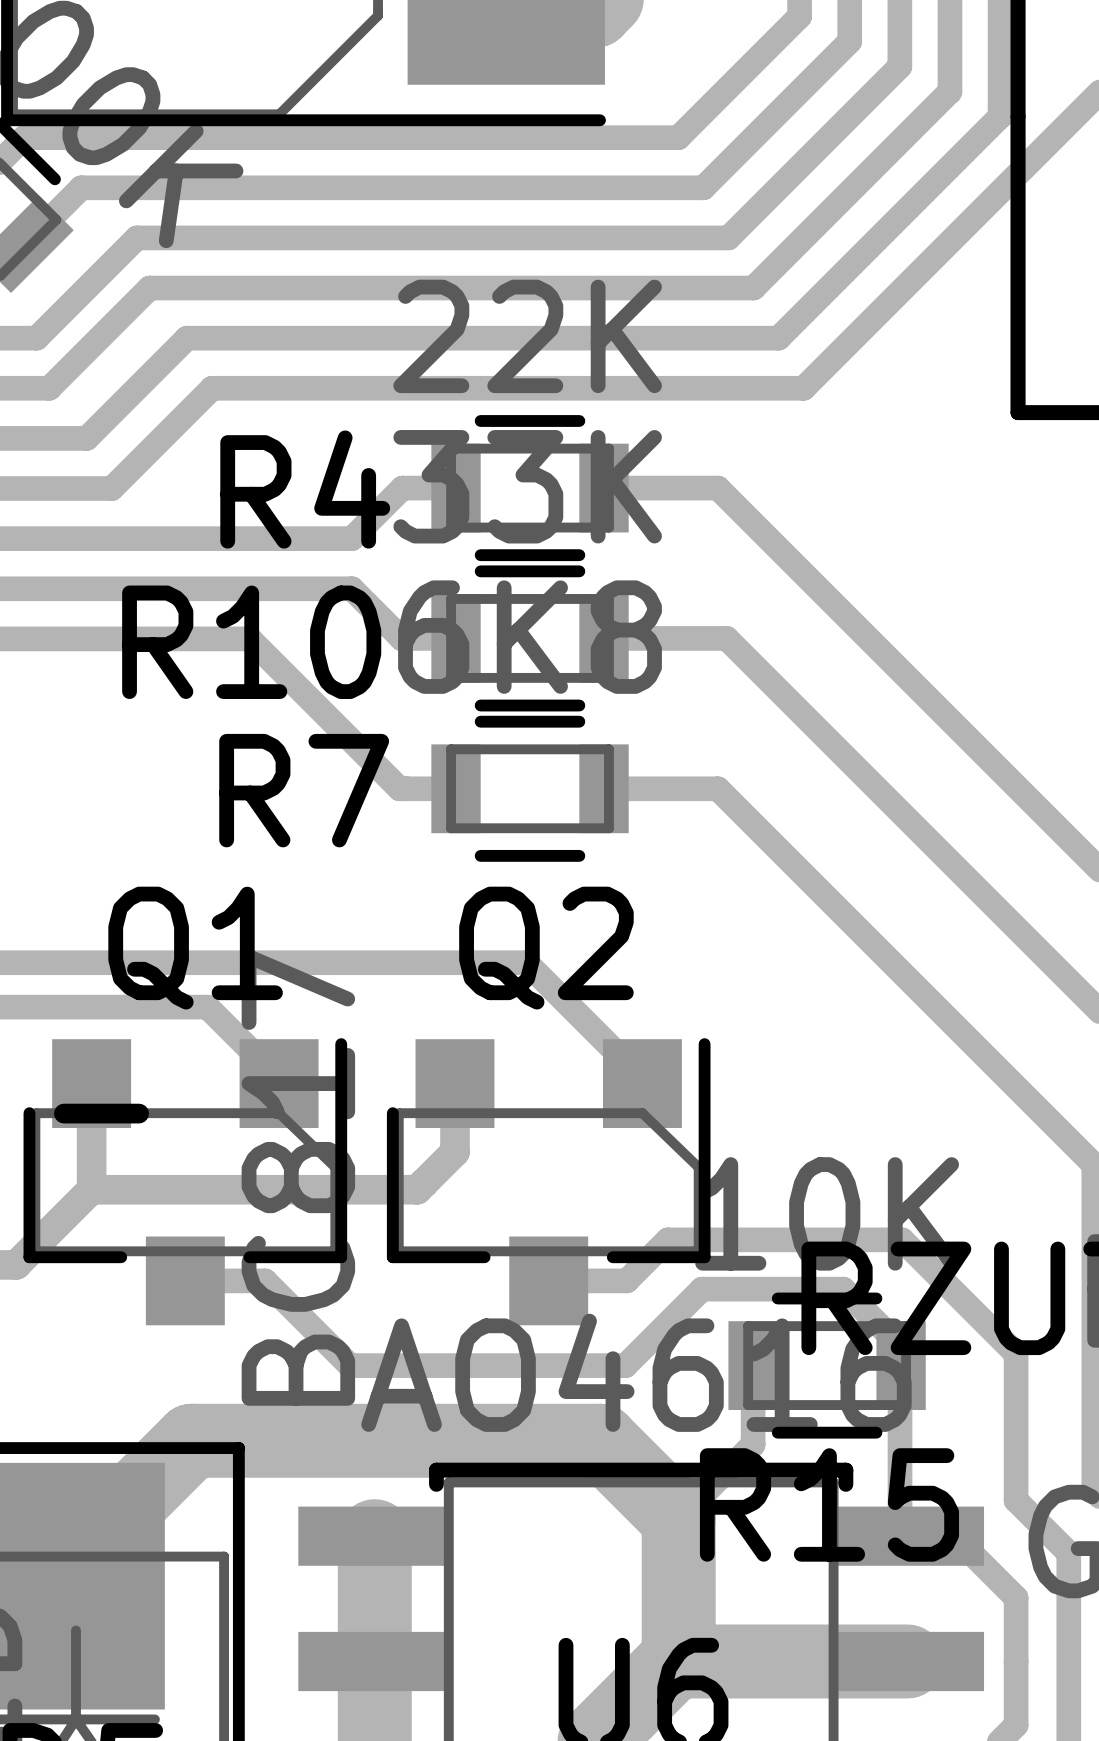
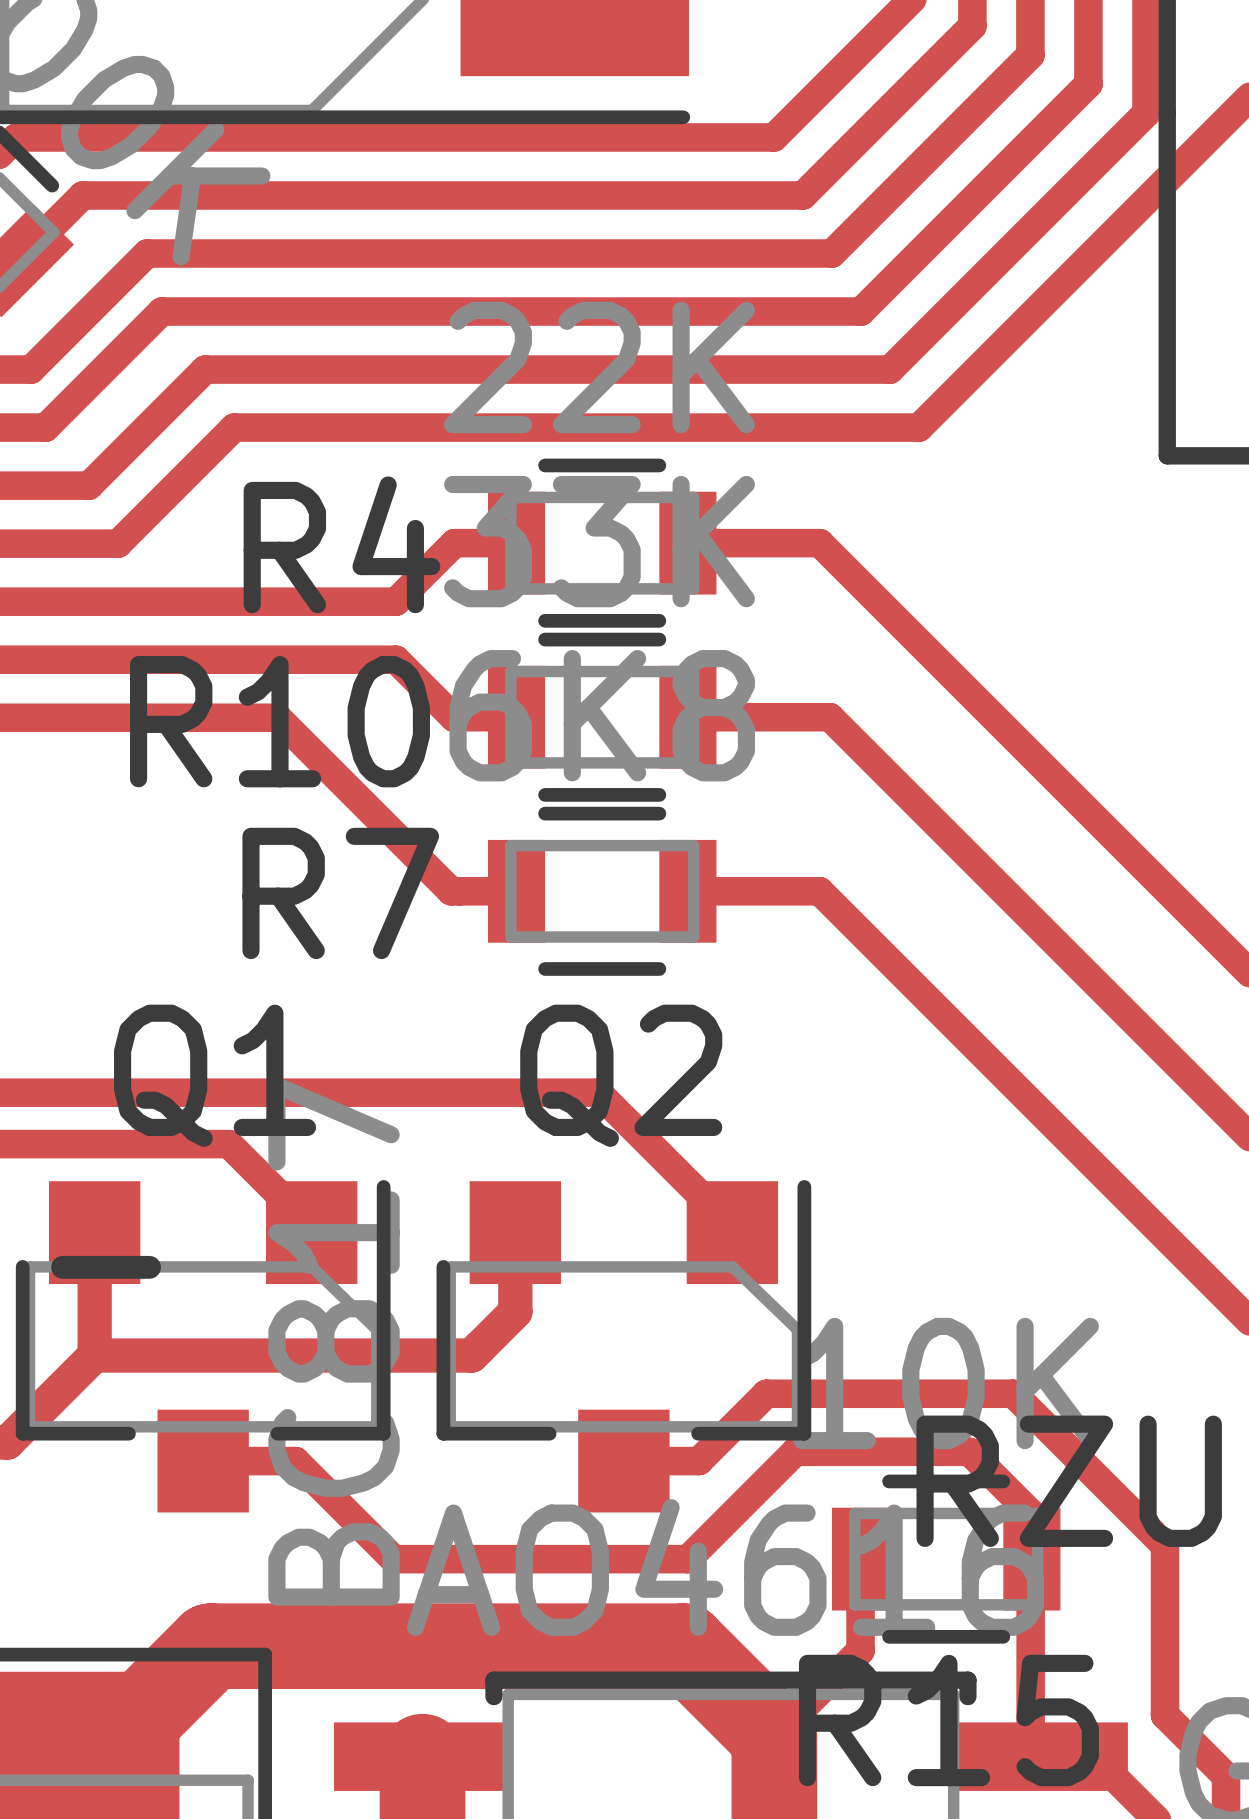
track: (902, 1239) (667, 1239) (626, 1280) (613, 1280) -> (1033, 1413) (1013, 1393) (766, 1393) (698, 1461)
track: (900, 1345) (843, 1289) (702, 1289) (625, 1365) (604, 1365) -> (1030, 1536) (1030, 1513) (969, 1451) (795, 1451) (687, 1559)

